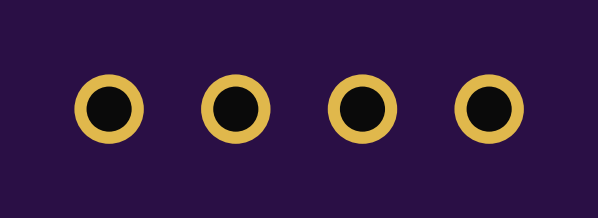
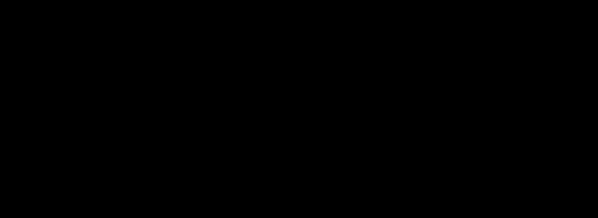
part: (109, 109) -> none
part: (235, 109) -> none
part: (362, 109) -> none
part: (489, 109) -> none

